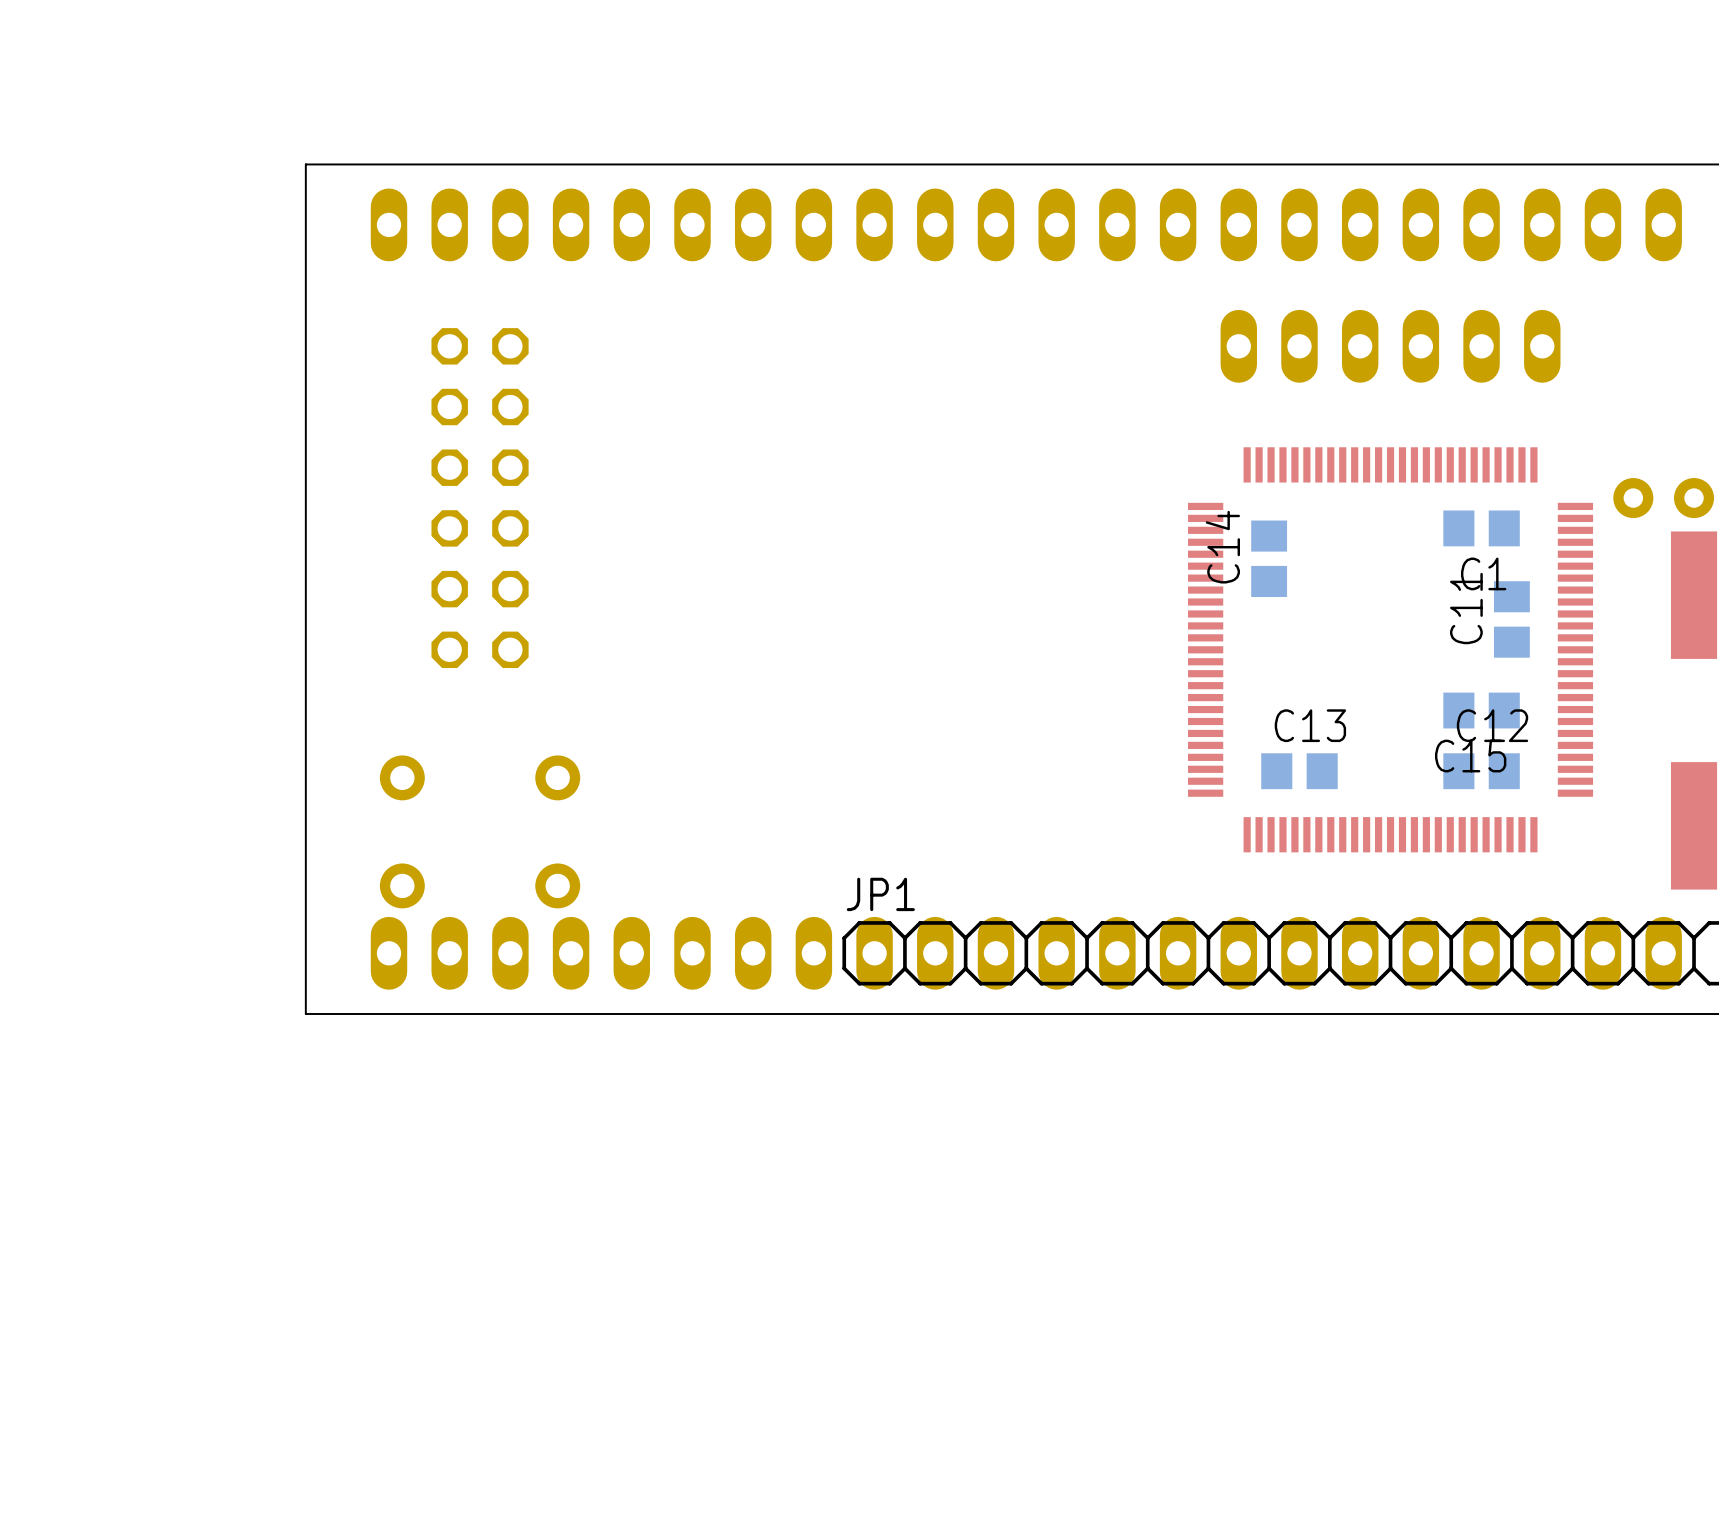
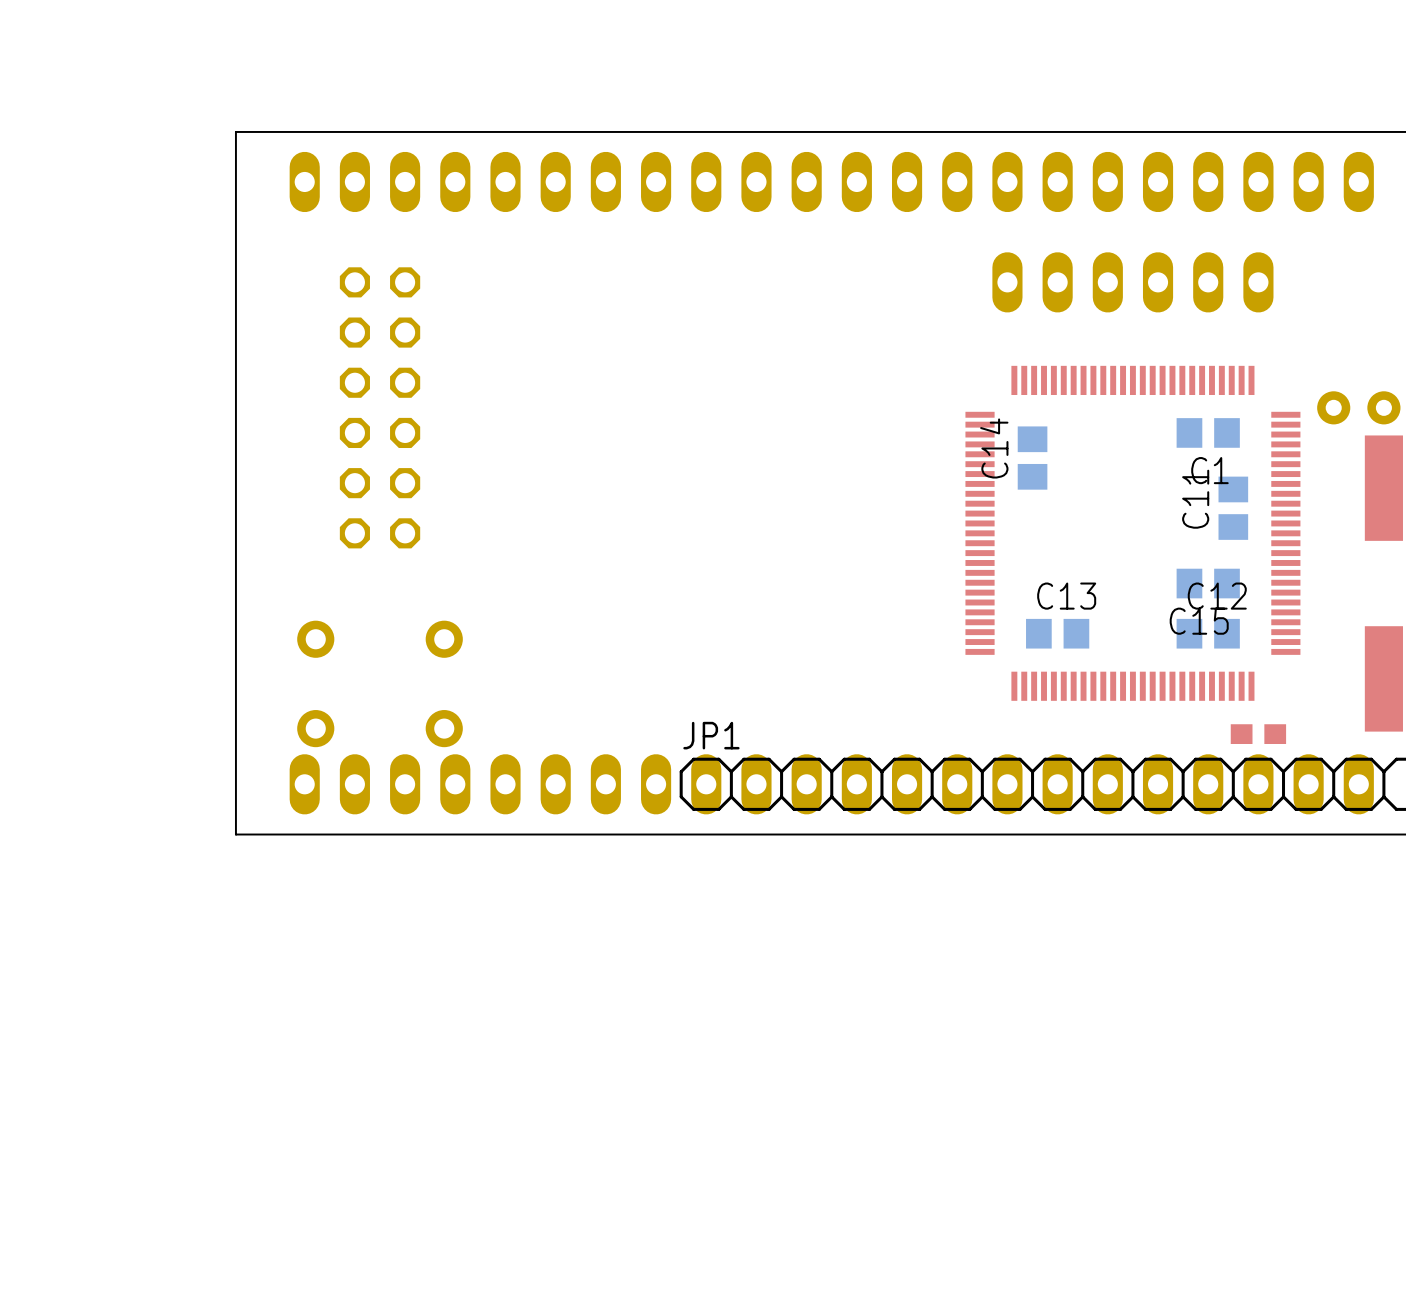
part: none -> (1258, 734)

